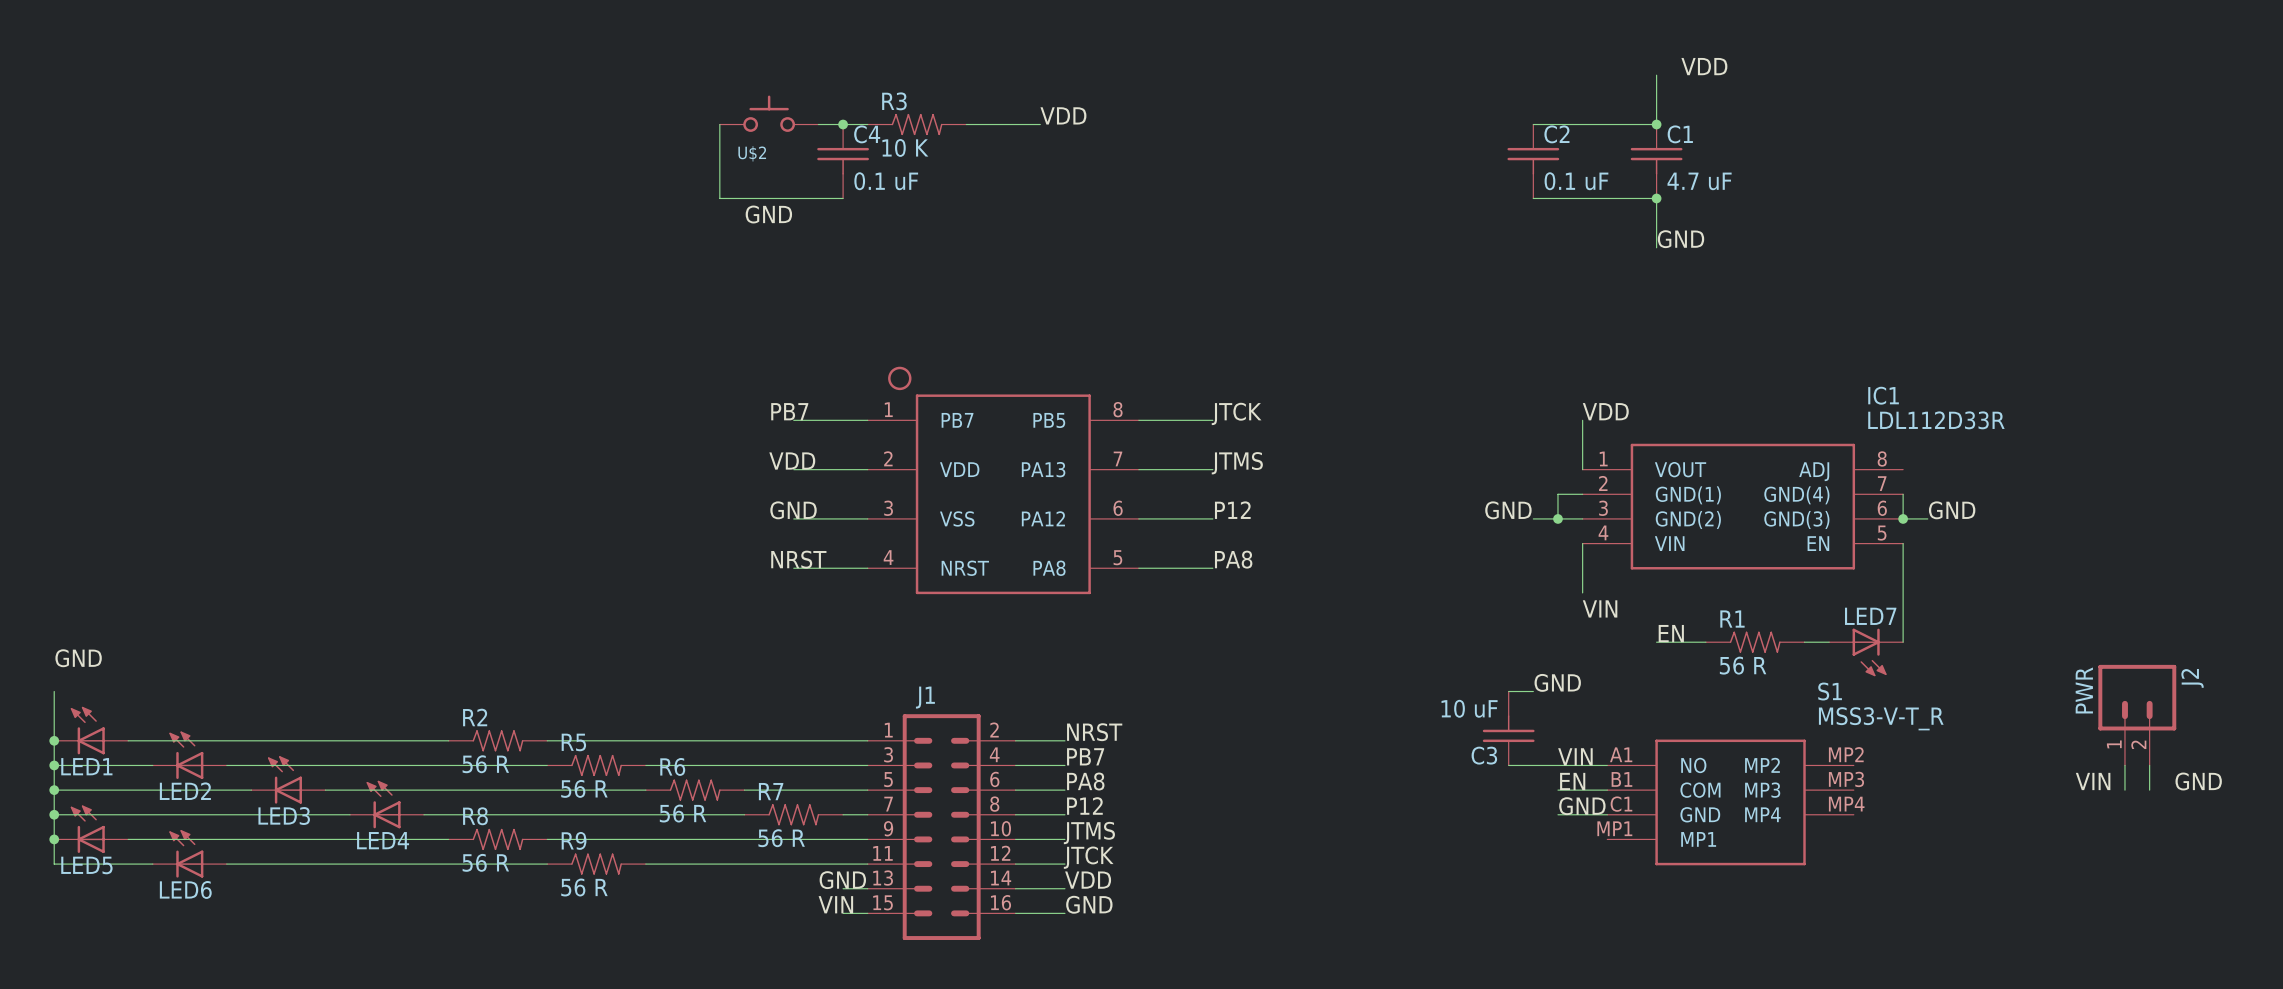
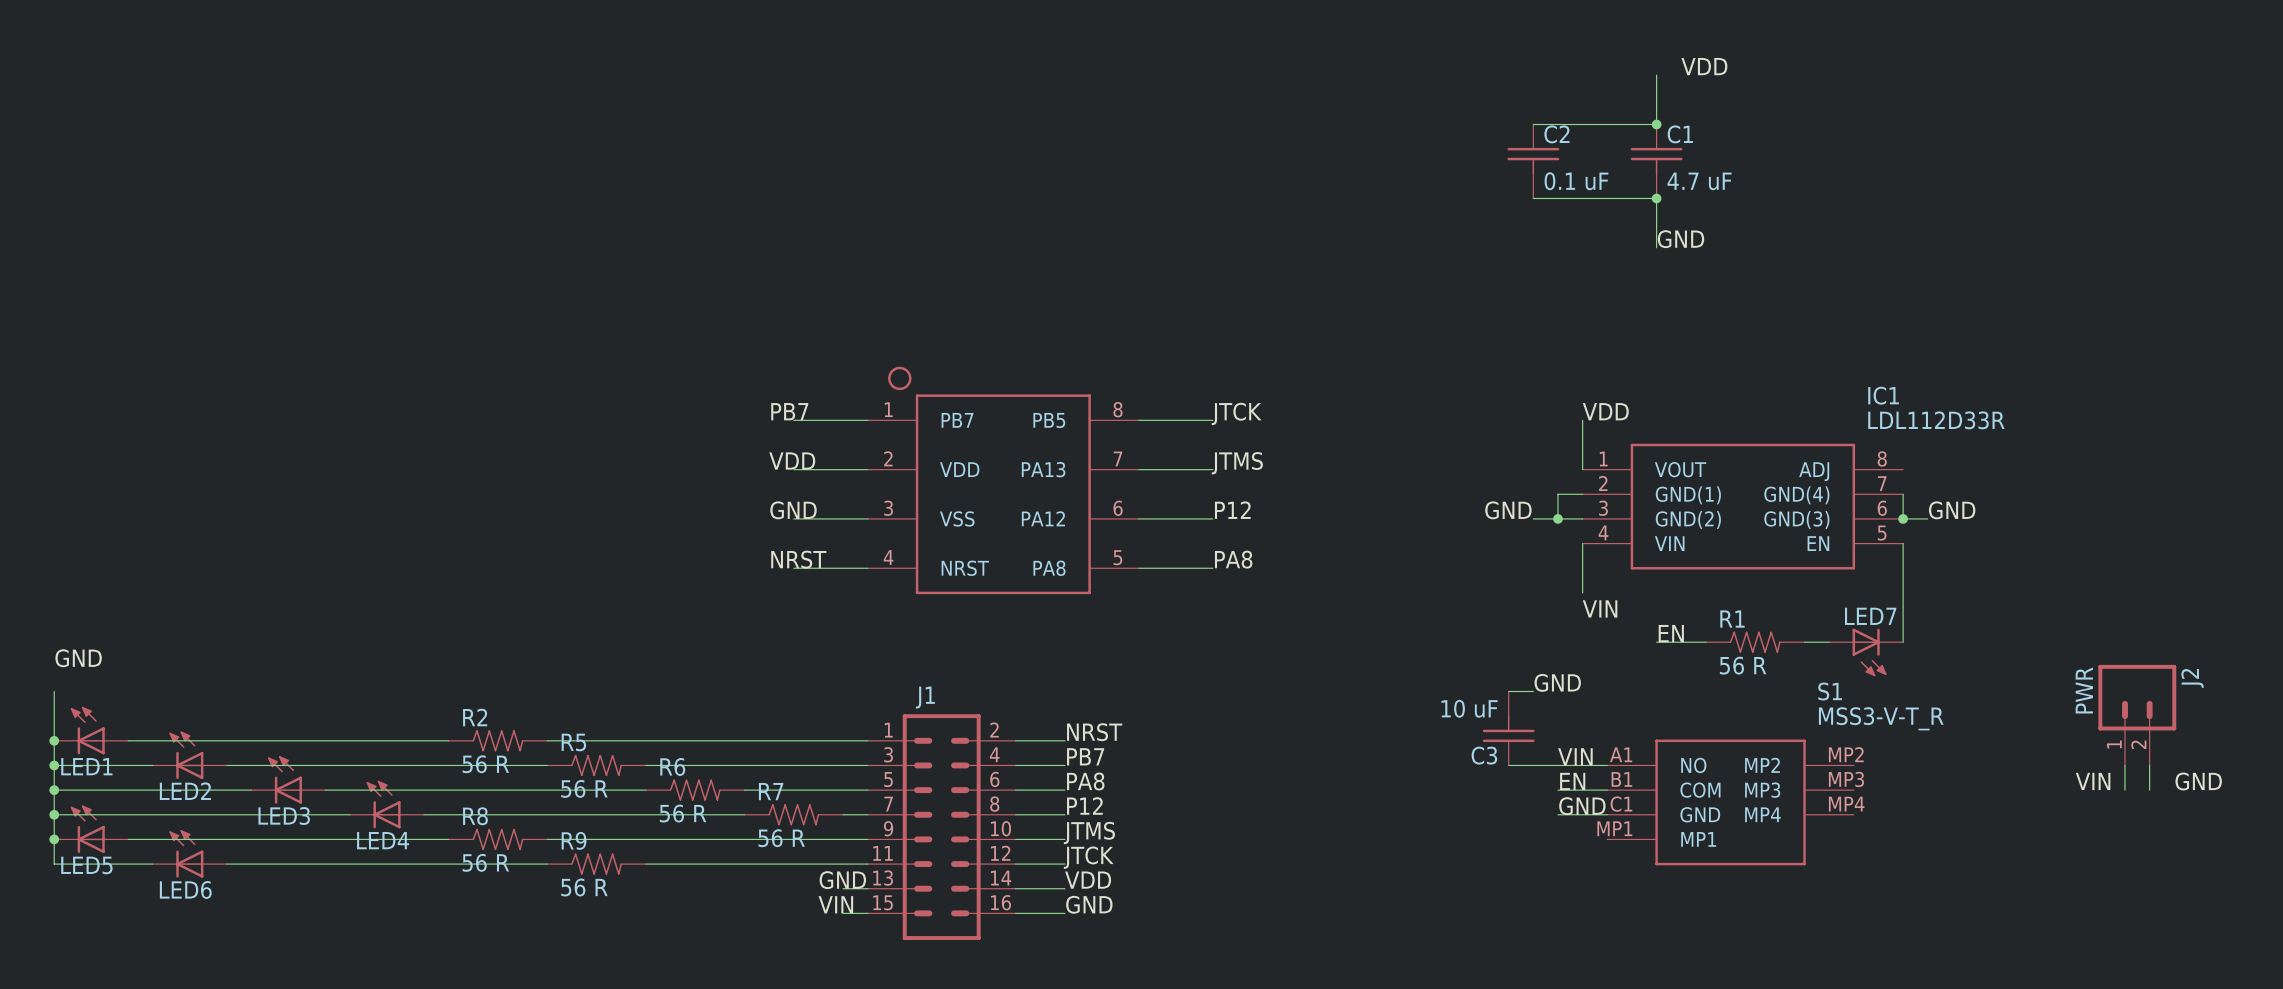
U$2: (769, 113) -> none
label: VDD (1063, 115) -> none
wire: (719, 124) (719, 198) (843, 198) -> none
wire: (818, 124) (867, 124) -> none
junction: (843, 124) -> none
R3: 10 K (917, 124) -> none
wire: (966, 124) (1040, 124) -> none
C4: 0.1 uF (843, 161) -> none
label: GND (768, 214) -> none

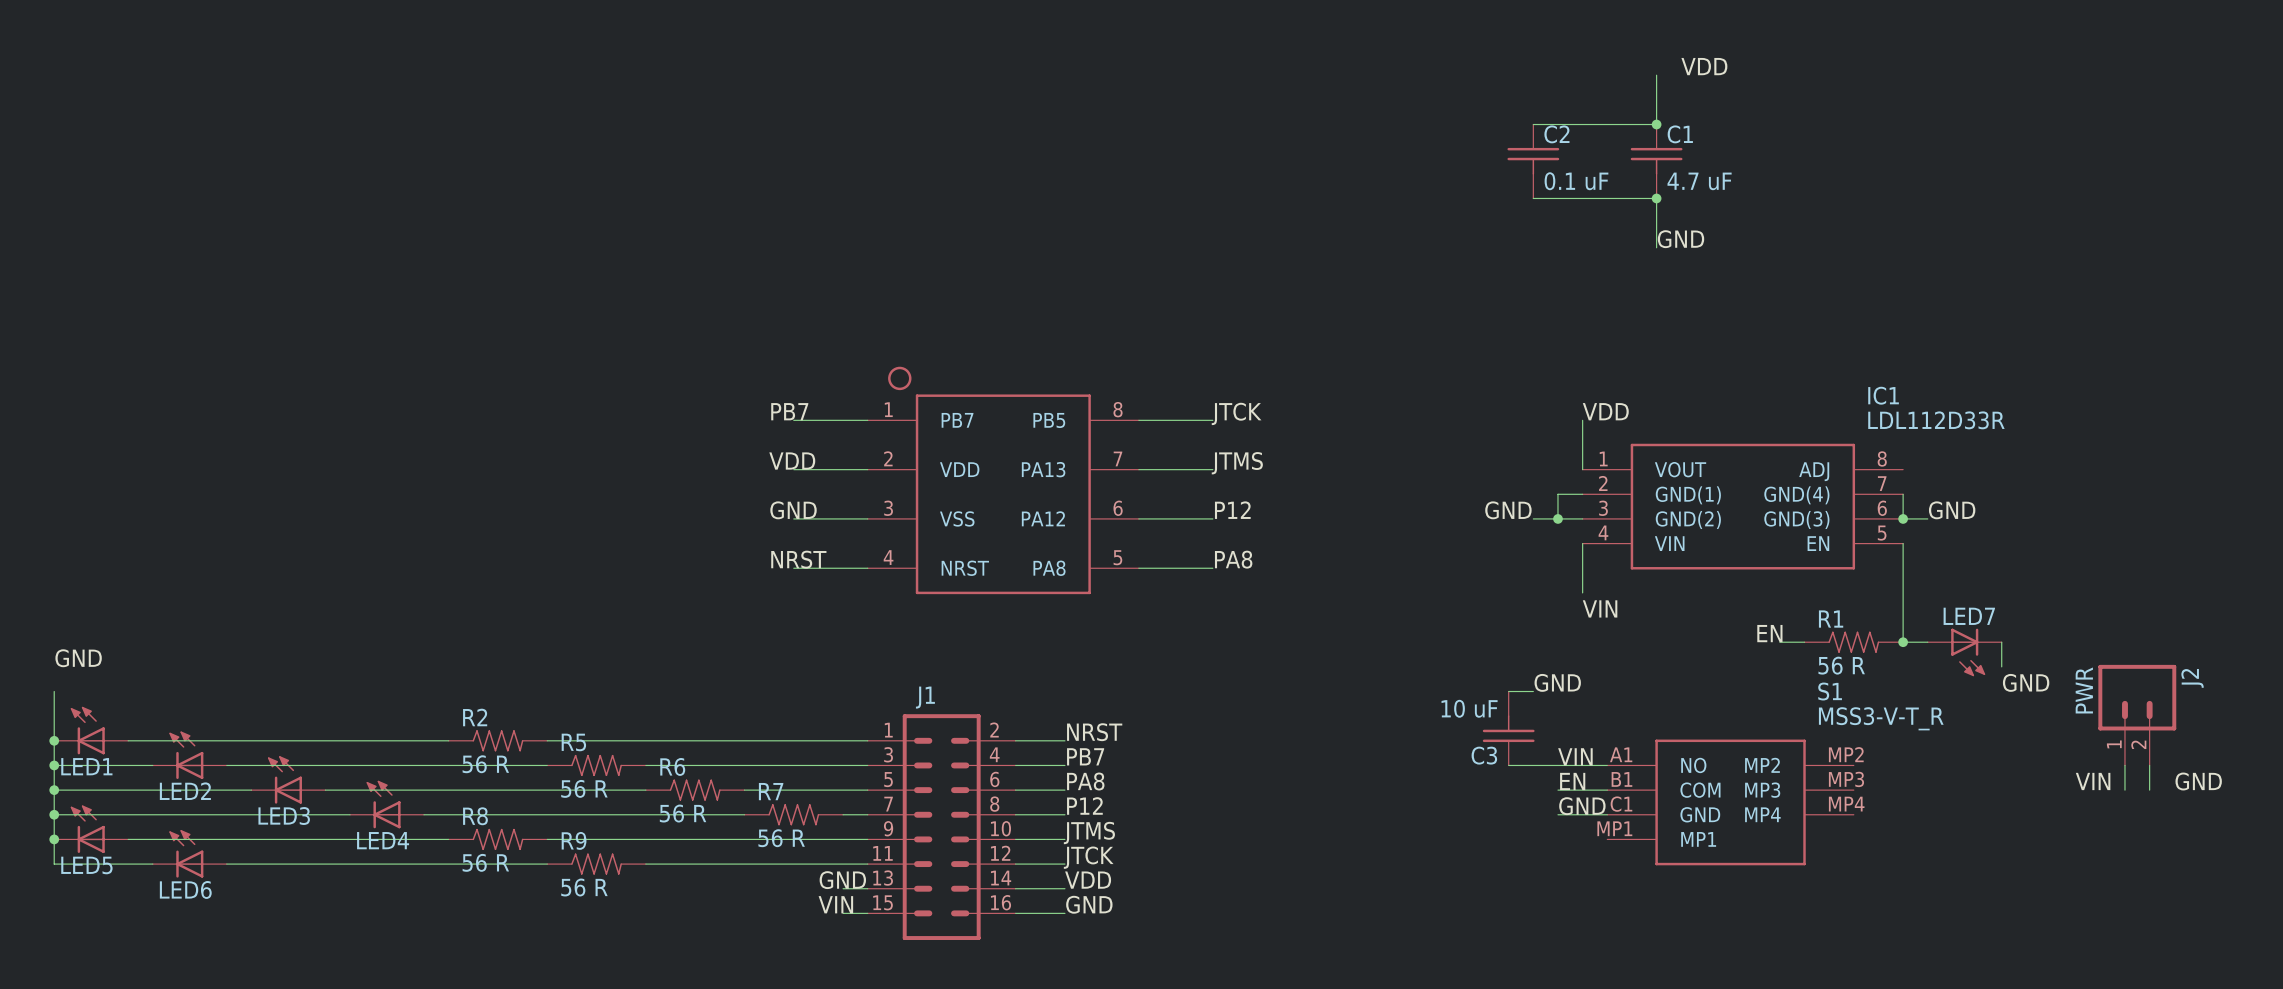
label position: EN (1671, 633) -> EN (1769, 633)
wire: (1656, 642) (1705, 642) -> none
R1 position: (1755, 642) -> (1853, 642)
wire: none -> (1903, 642) (1927, 642)
junction: none -> (1903, 642)
wire: none -> (2001, 642) (2001, 666)
LED7 position: (1866, 652) -> (1964, 652)
label: none -> GND (2026, 682)

